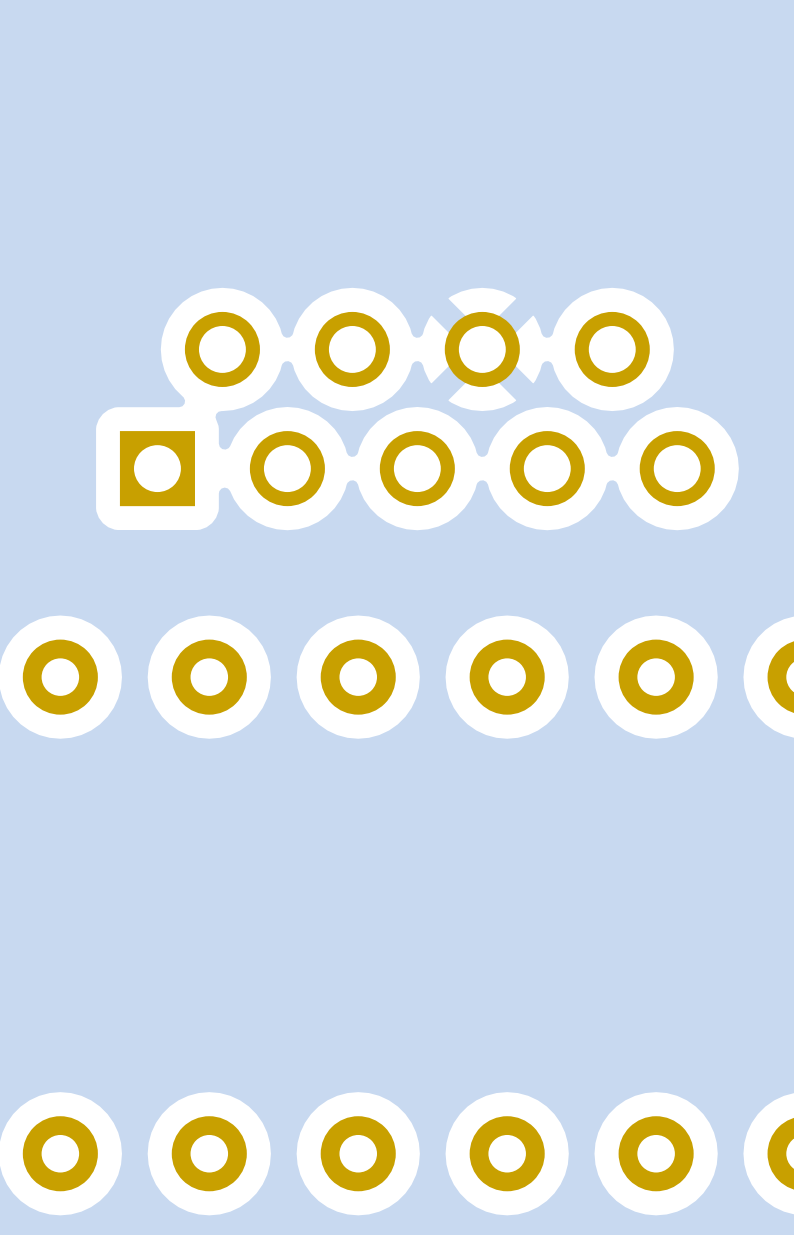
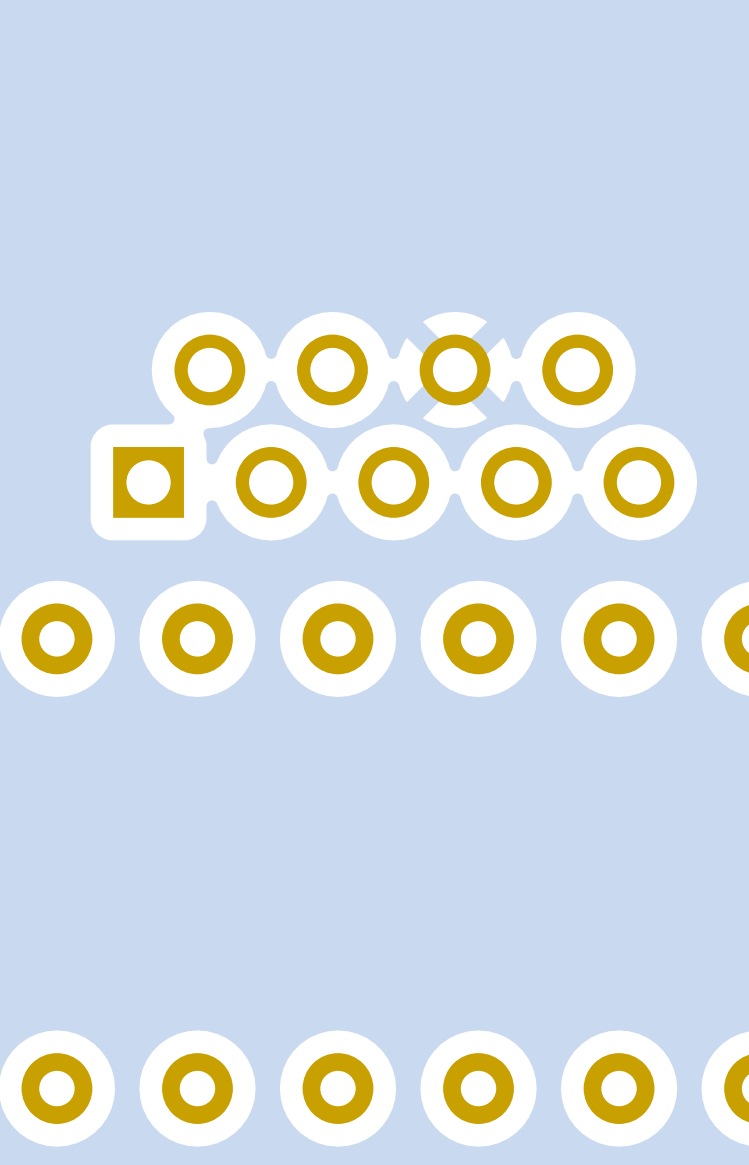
part position: (417, 409) -> (393, 426)

